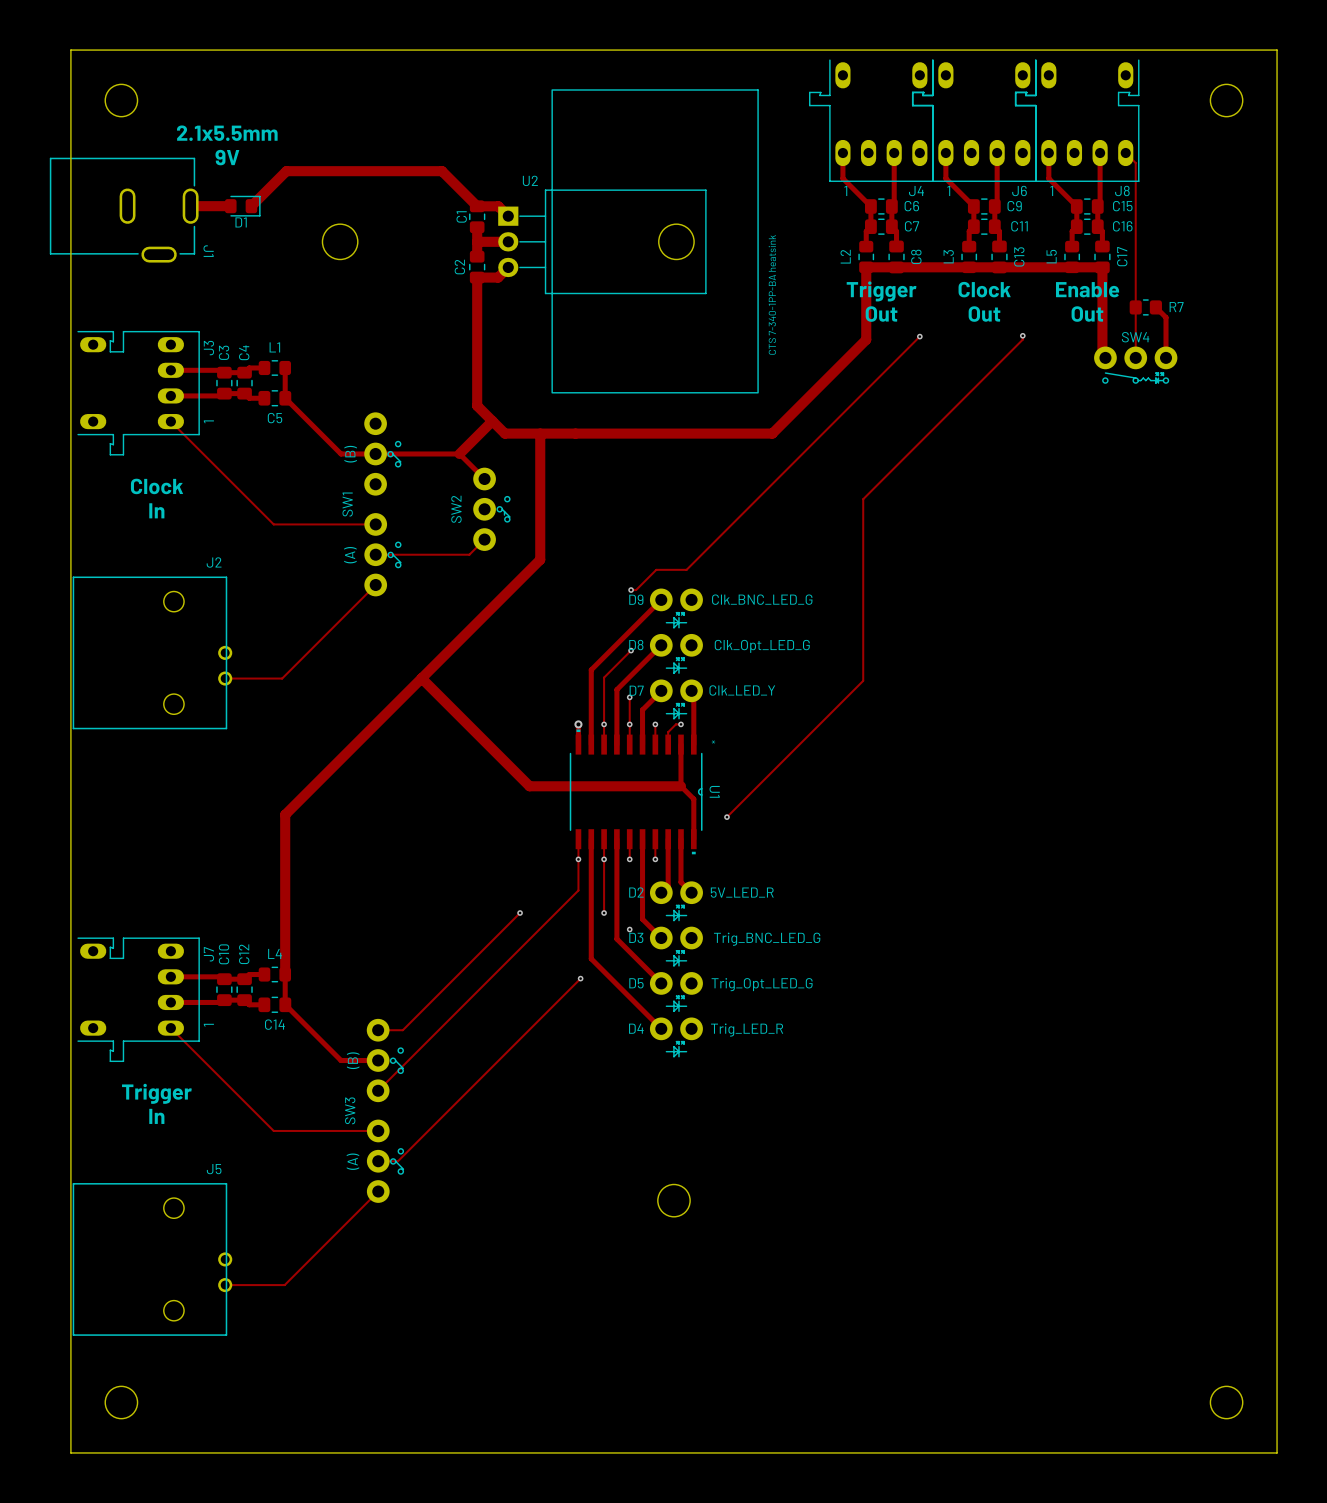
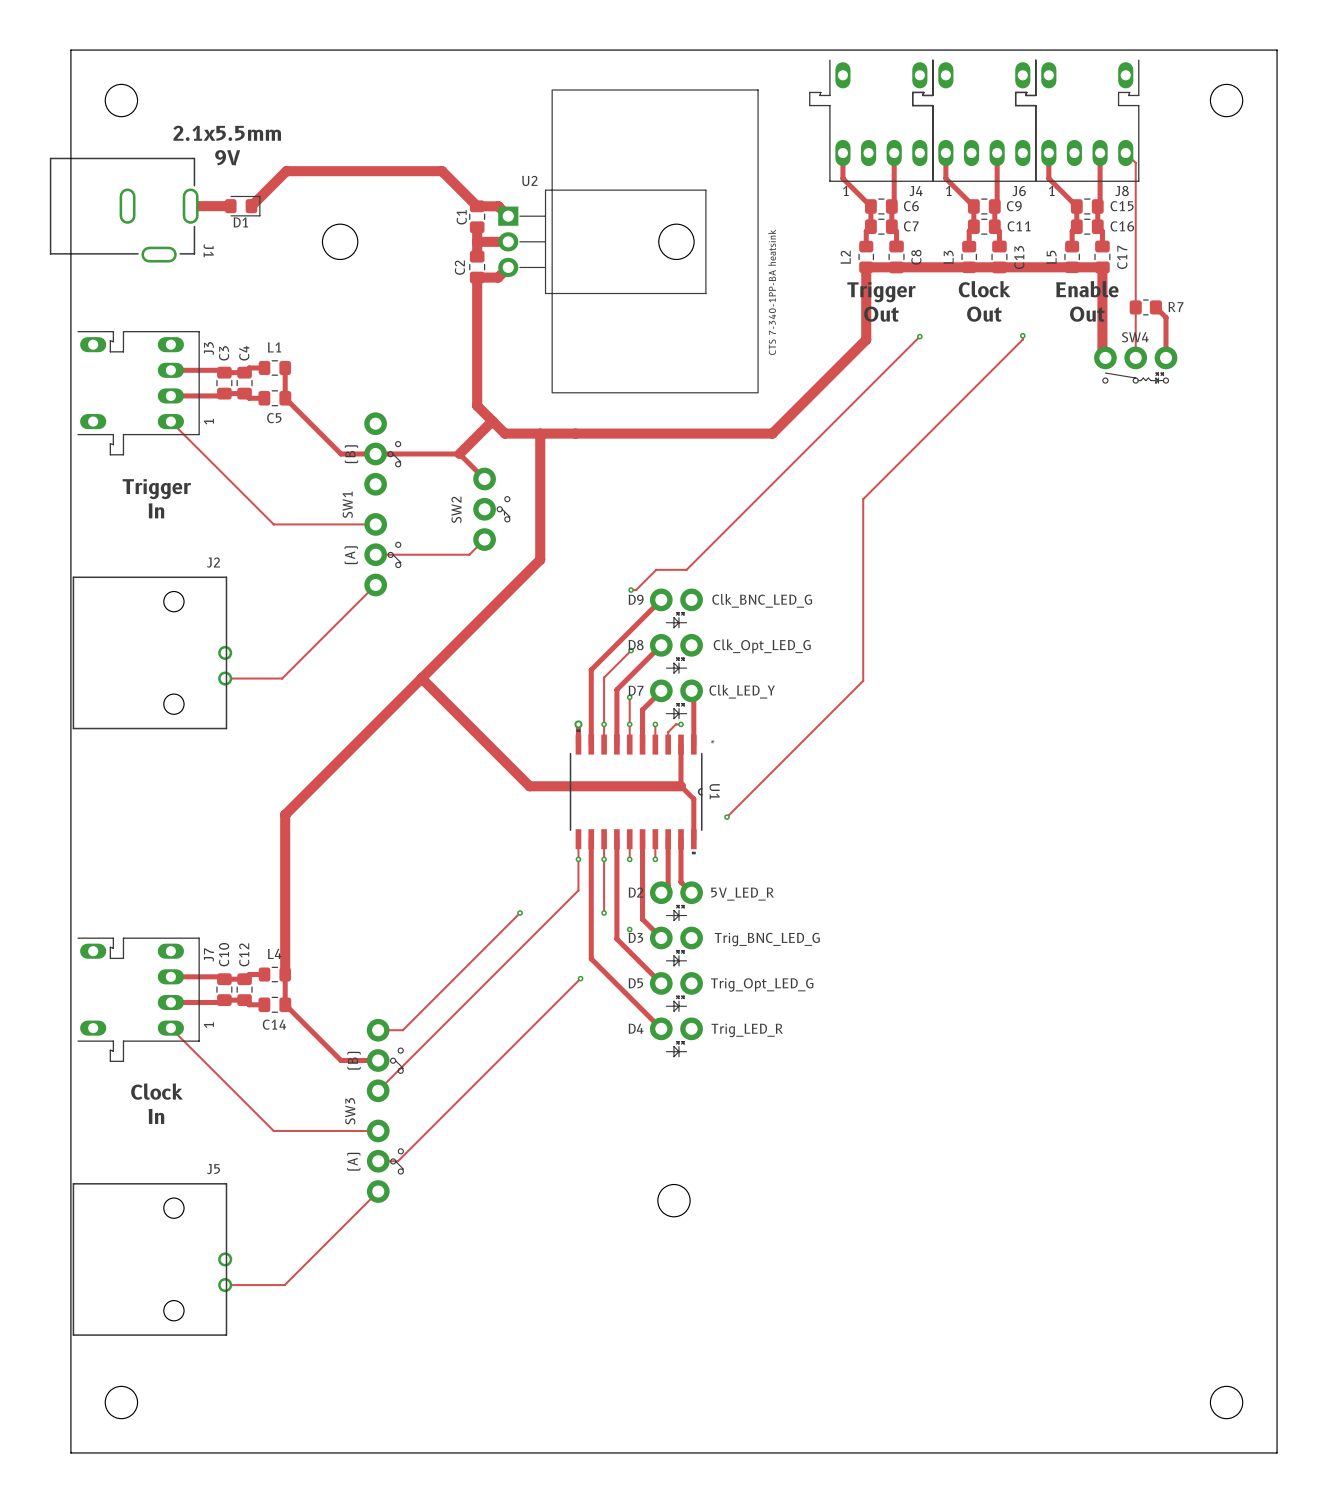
text: Clock (157, 486) -> Trigger (156, 489)
text: Trigger (156, 1093) -> Clock (157, 1091)

